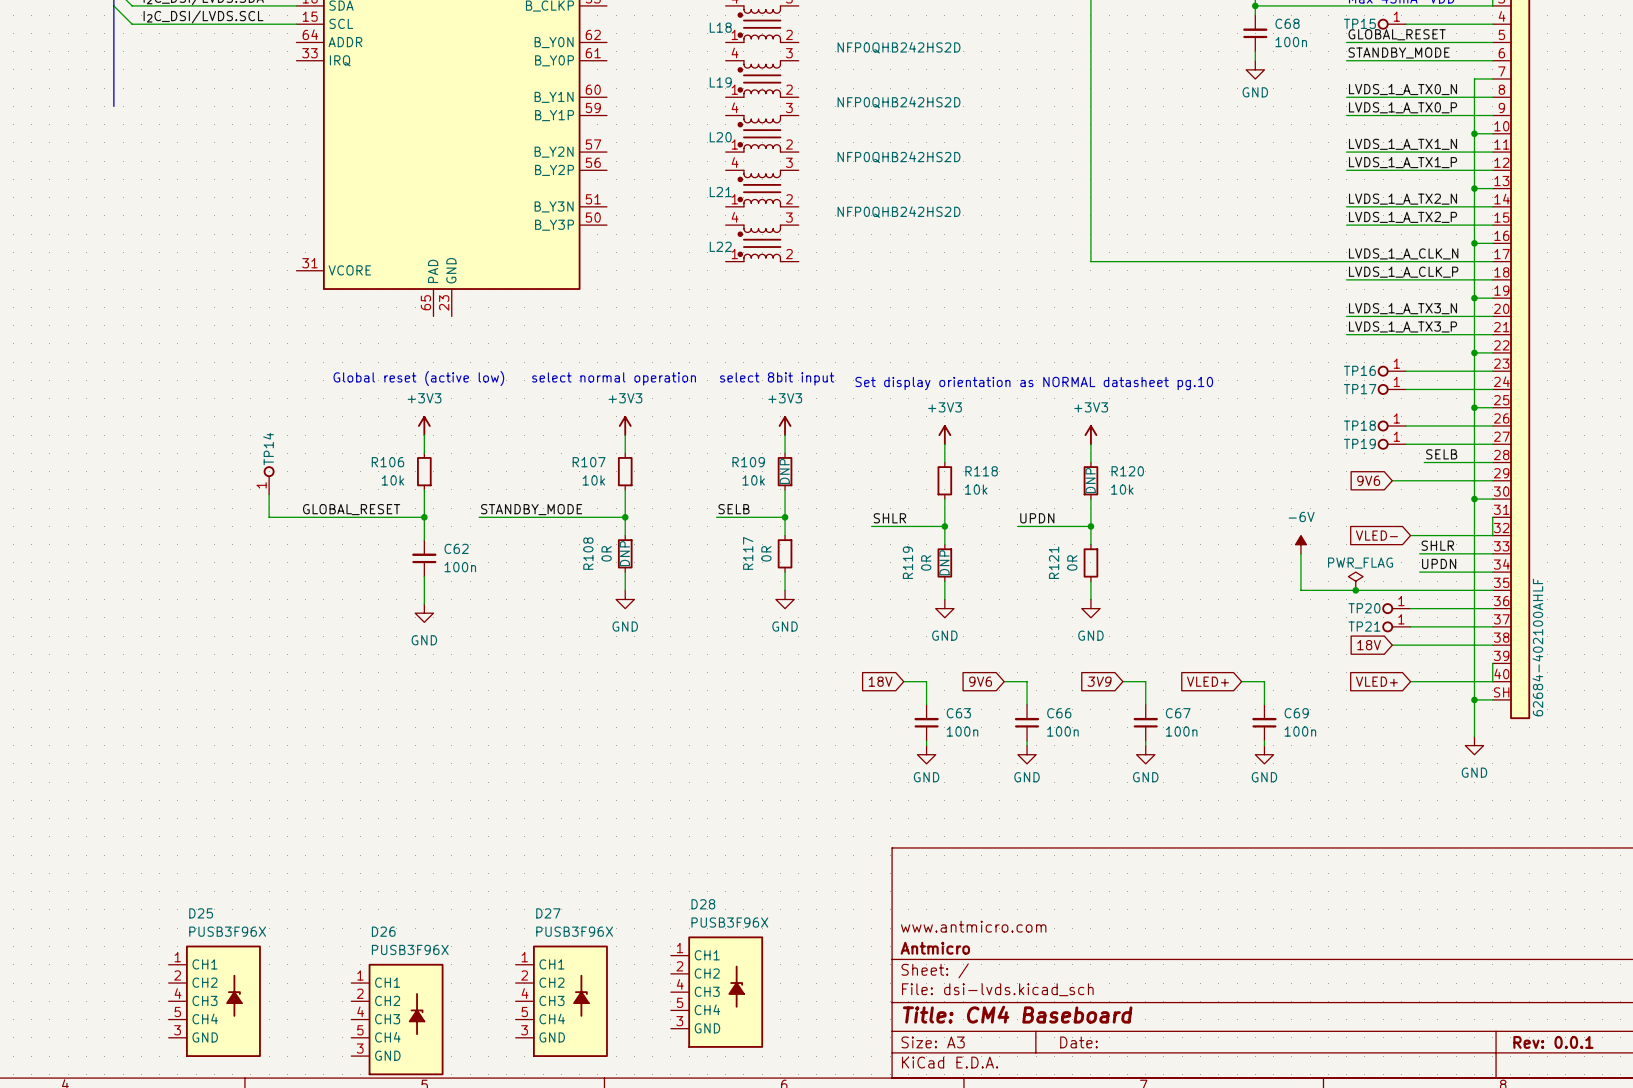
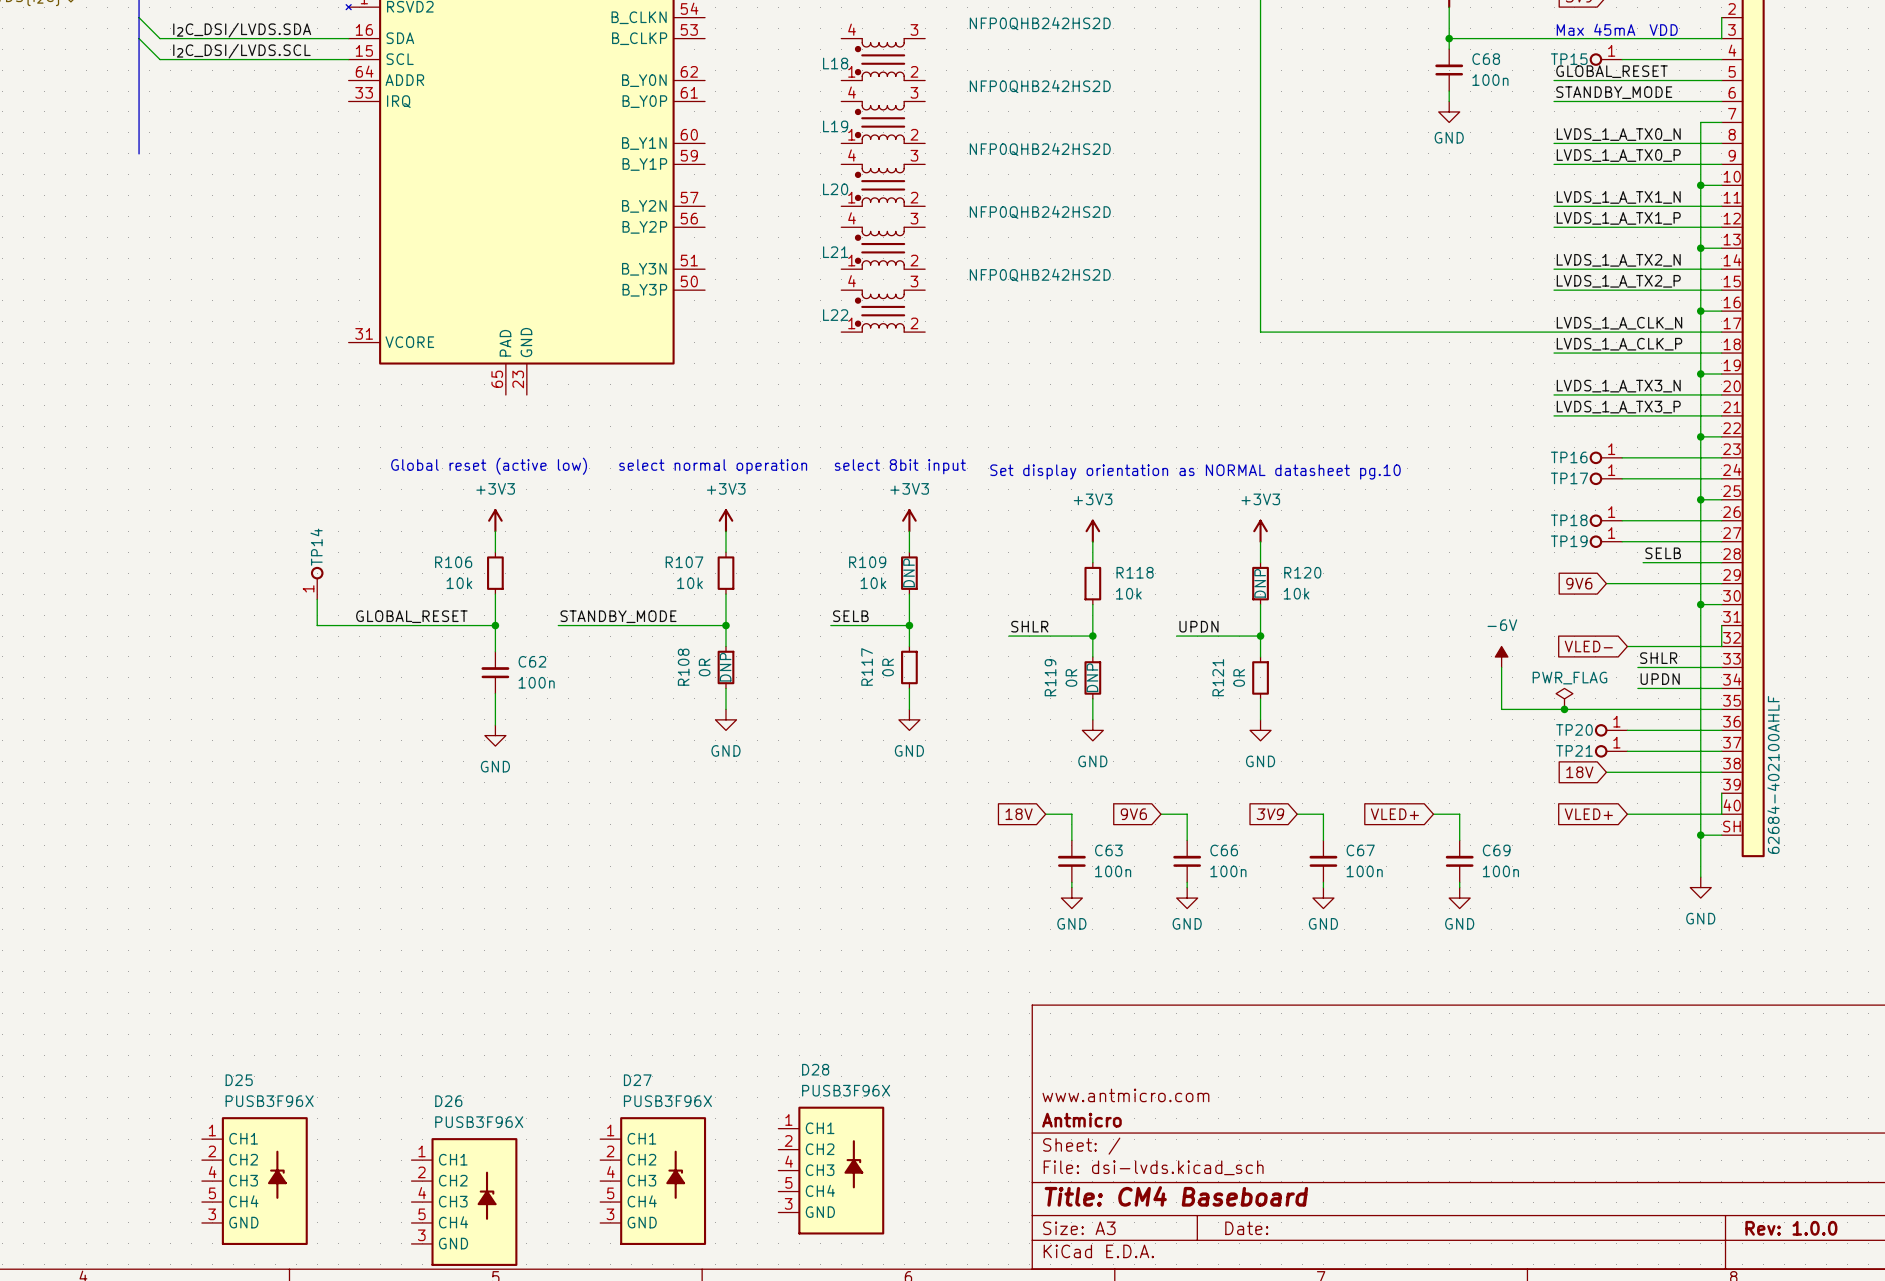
title block: Rev: 0.0.1 (1553, 1042) -> Rev: 1.0.0 (1791, 1228)

